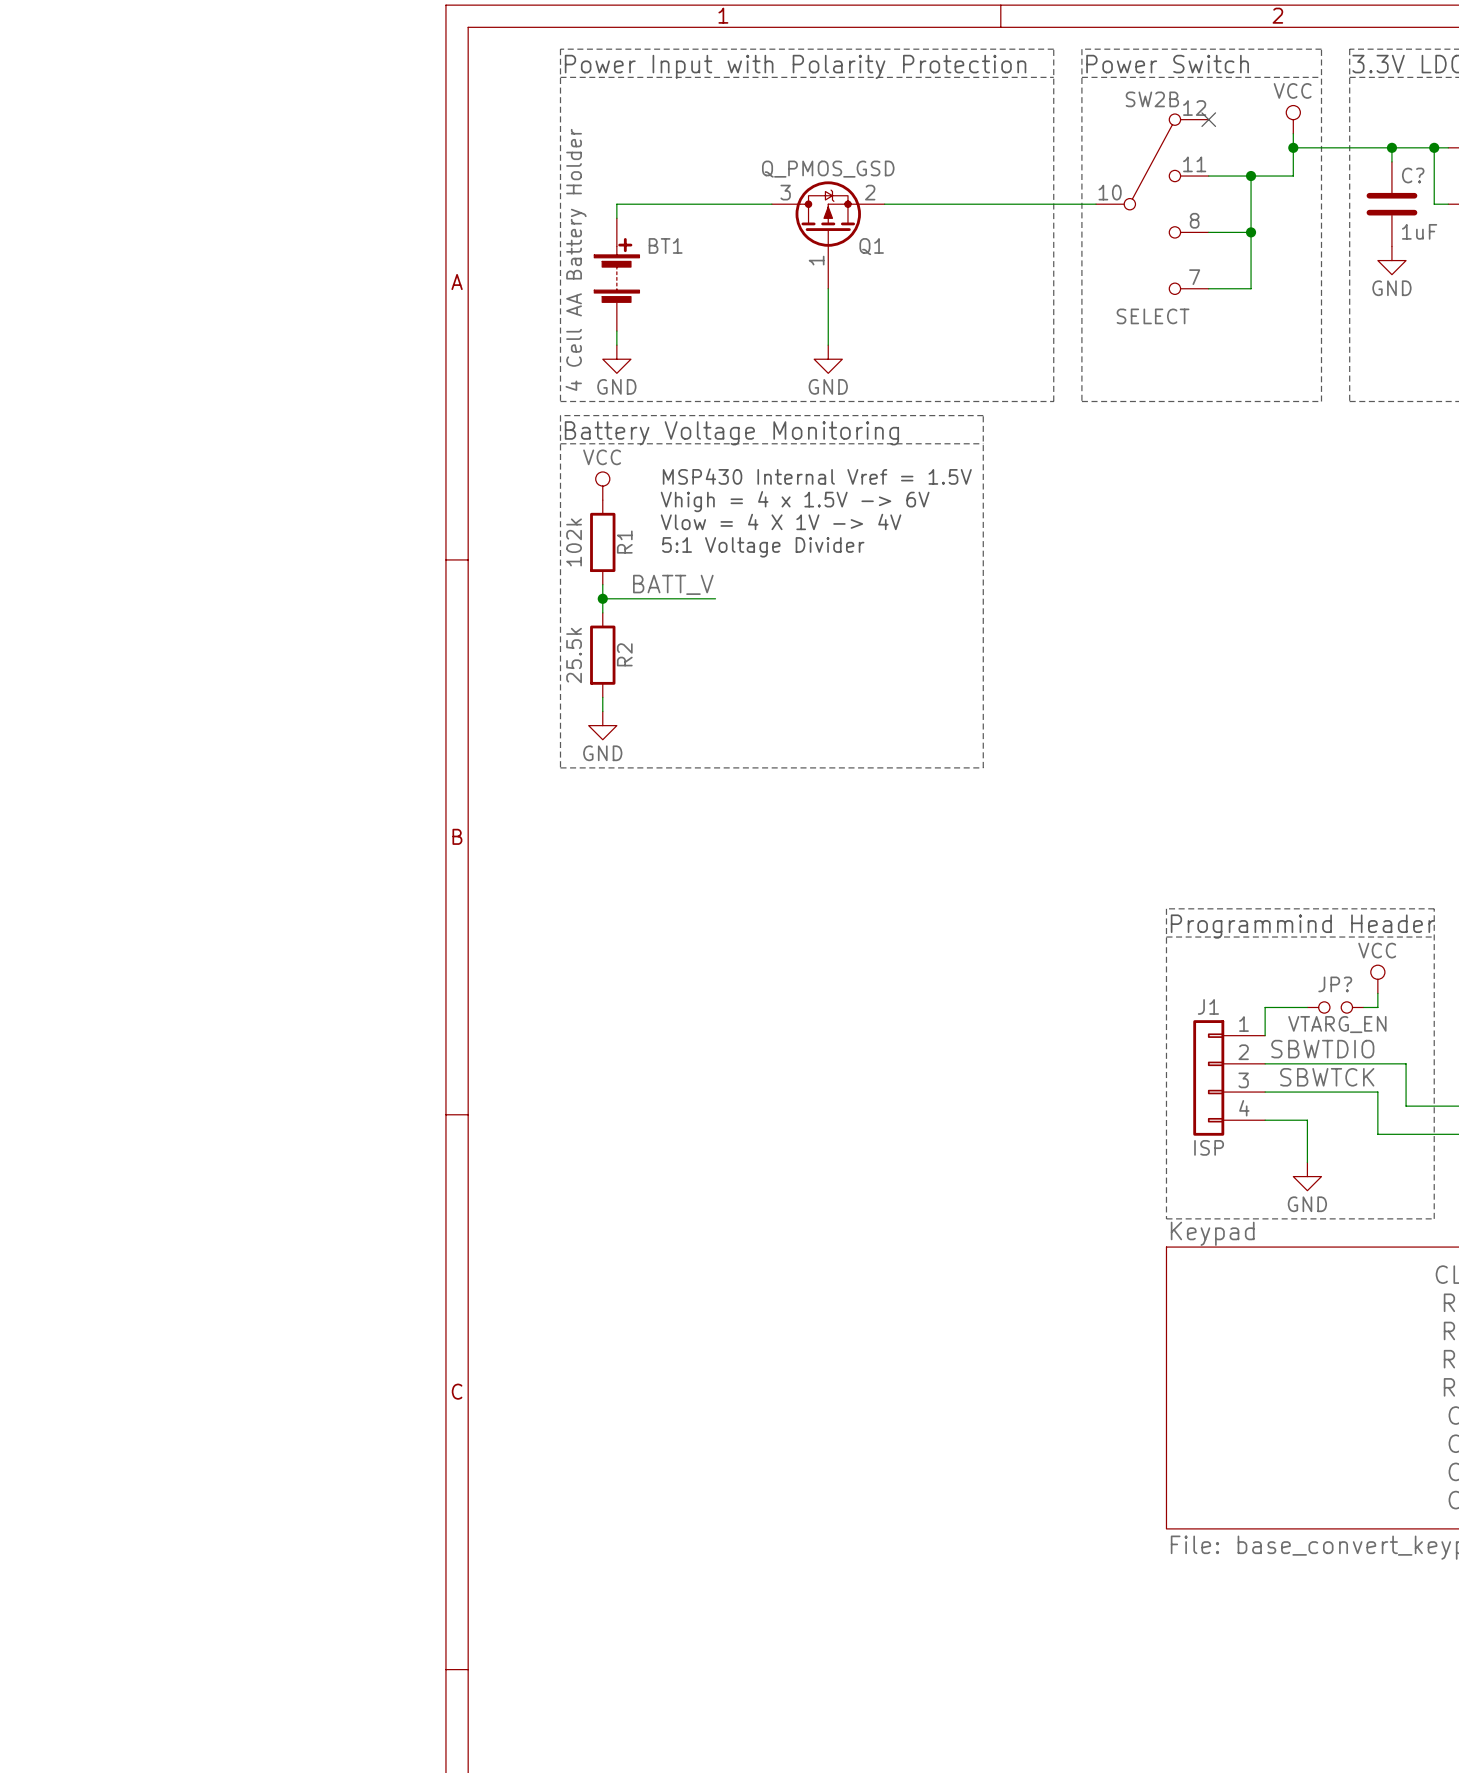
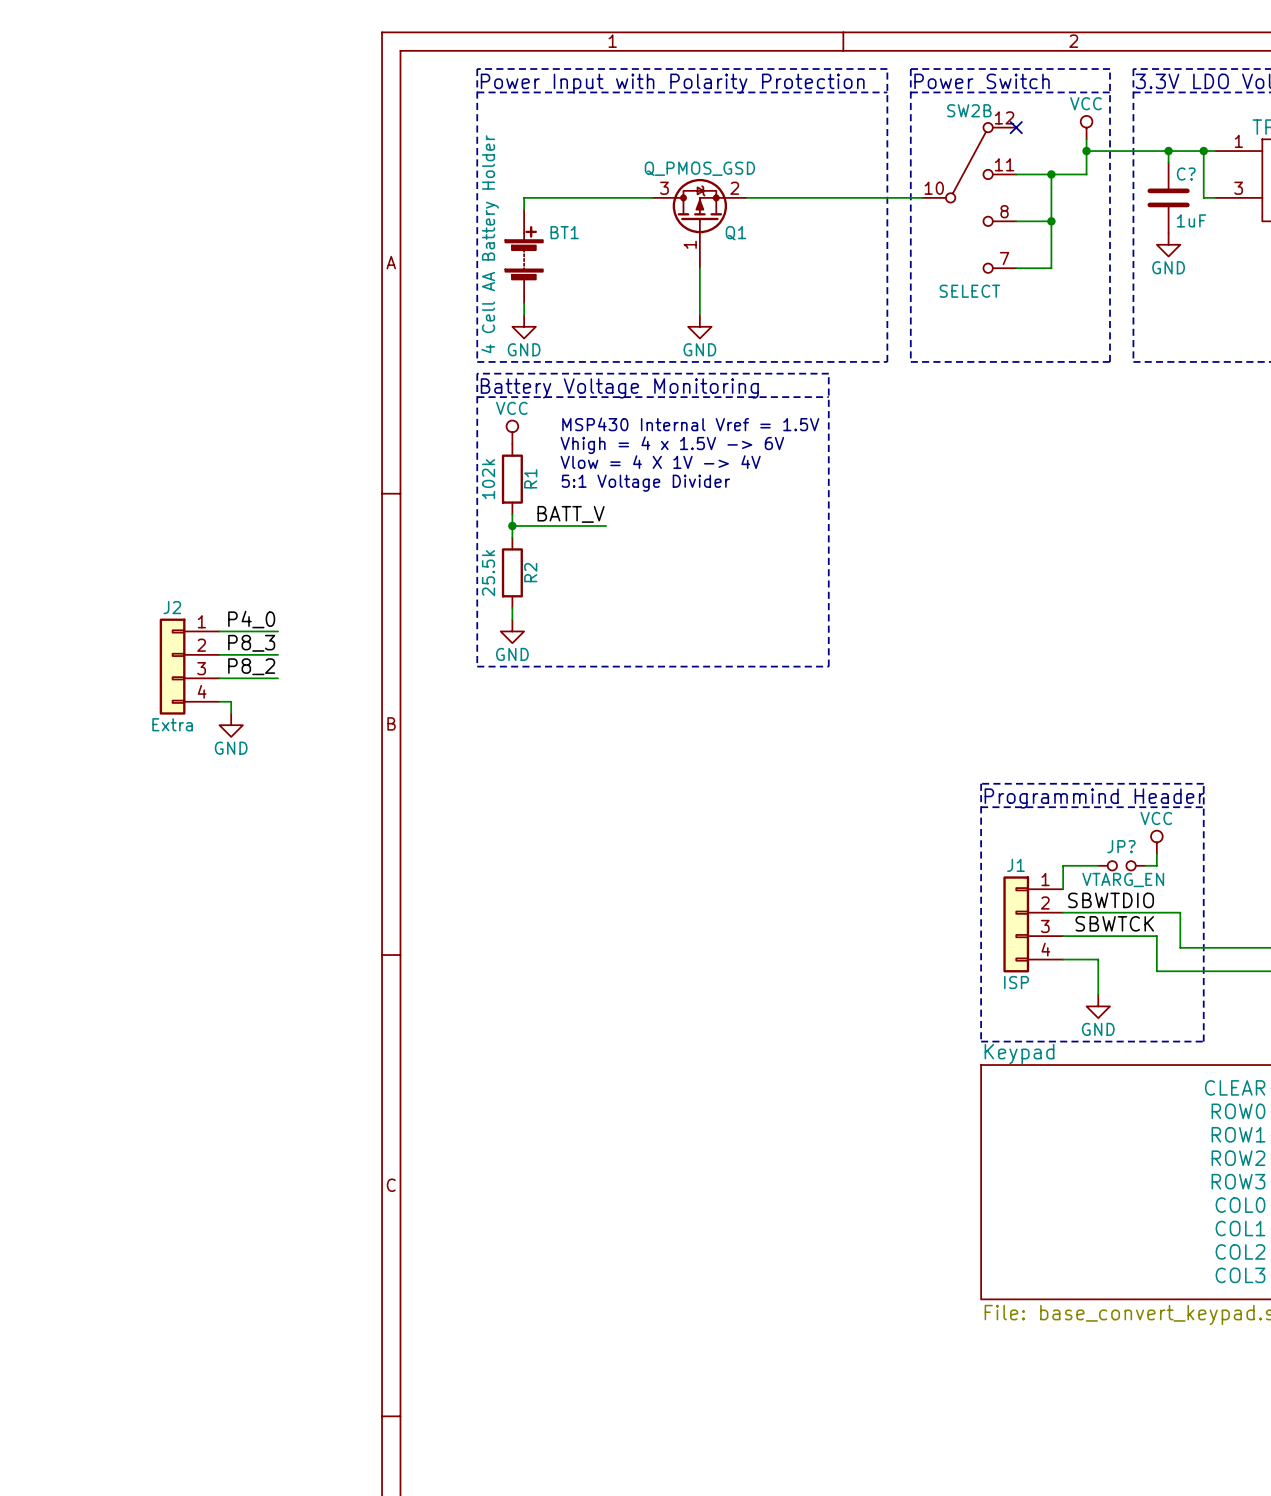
label: none -> P4_0 (251, 619)
wire: none -> (219, 631) (278, 631)
label: none -> P8_3 (251, 643)
wire: none -> (219, 654) (278, 654)
J2: none -> Extra (189, 666)
label: none -> P8_2 (251, 666)
wire: none -> (219, 678) (278, 678)
wire: none -> (219, 701) (231, 701) (231, 713)
power symbol: none -> GND (231, 725)

